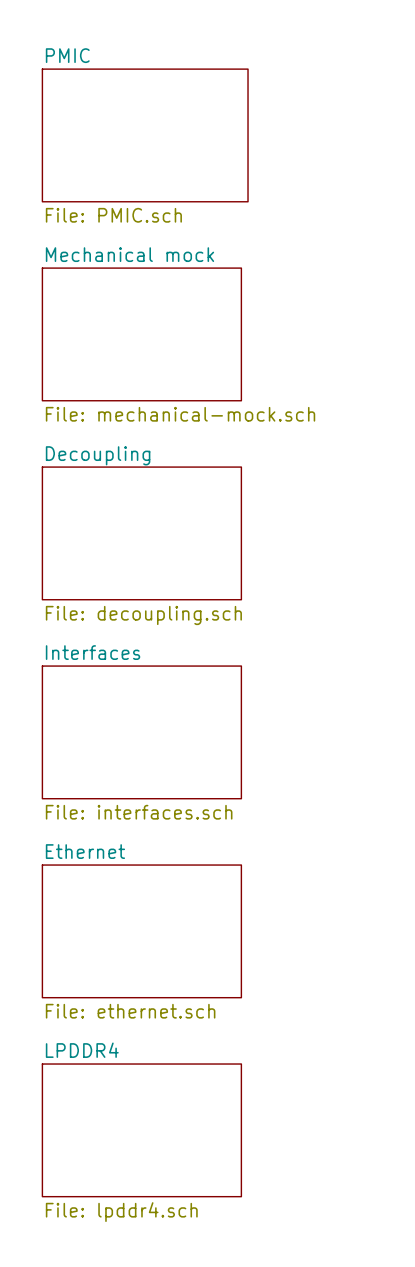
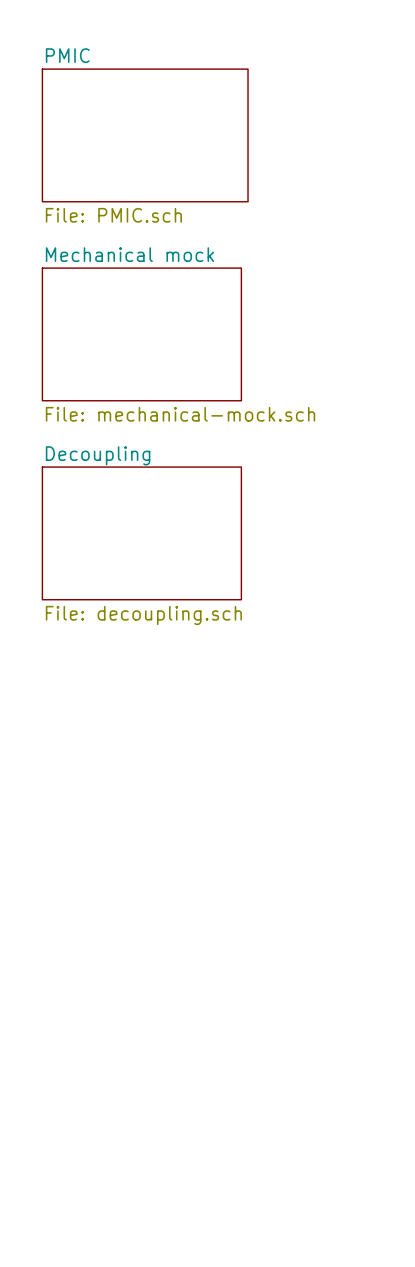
sheet Interfaces: File: interfaces.sch (141, 732) -> none
sheet Ethernet: File: ethernet.sch (141, 931) -> none
sheet LPDDR4: File: lpddr4.sch (141, 1130) -> none

